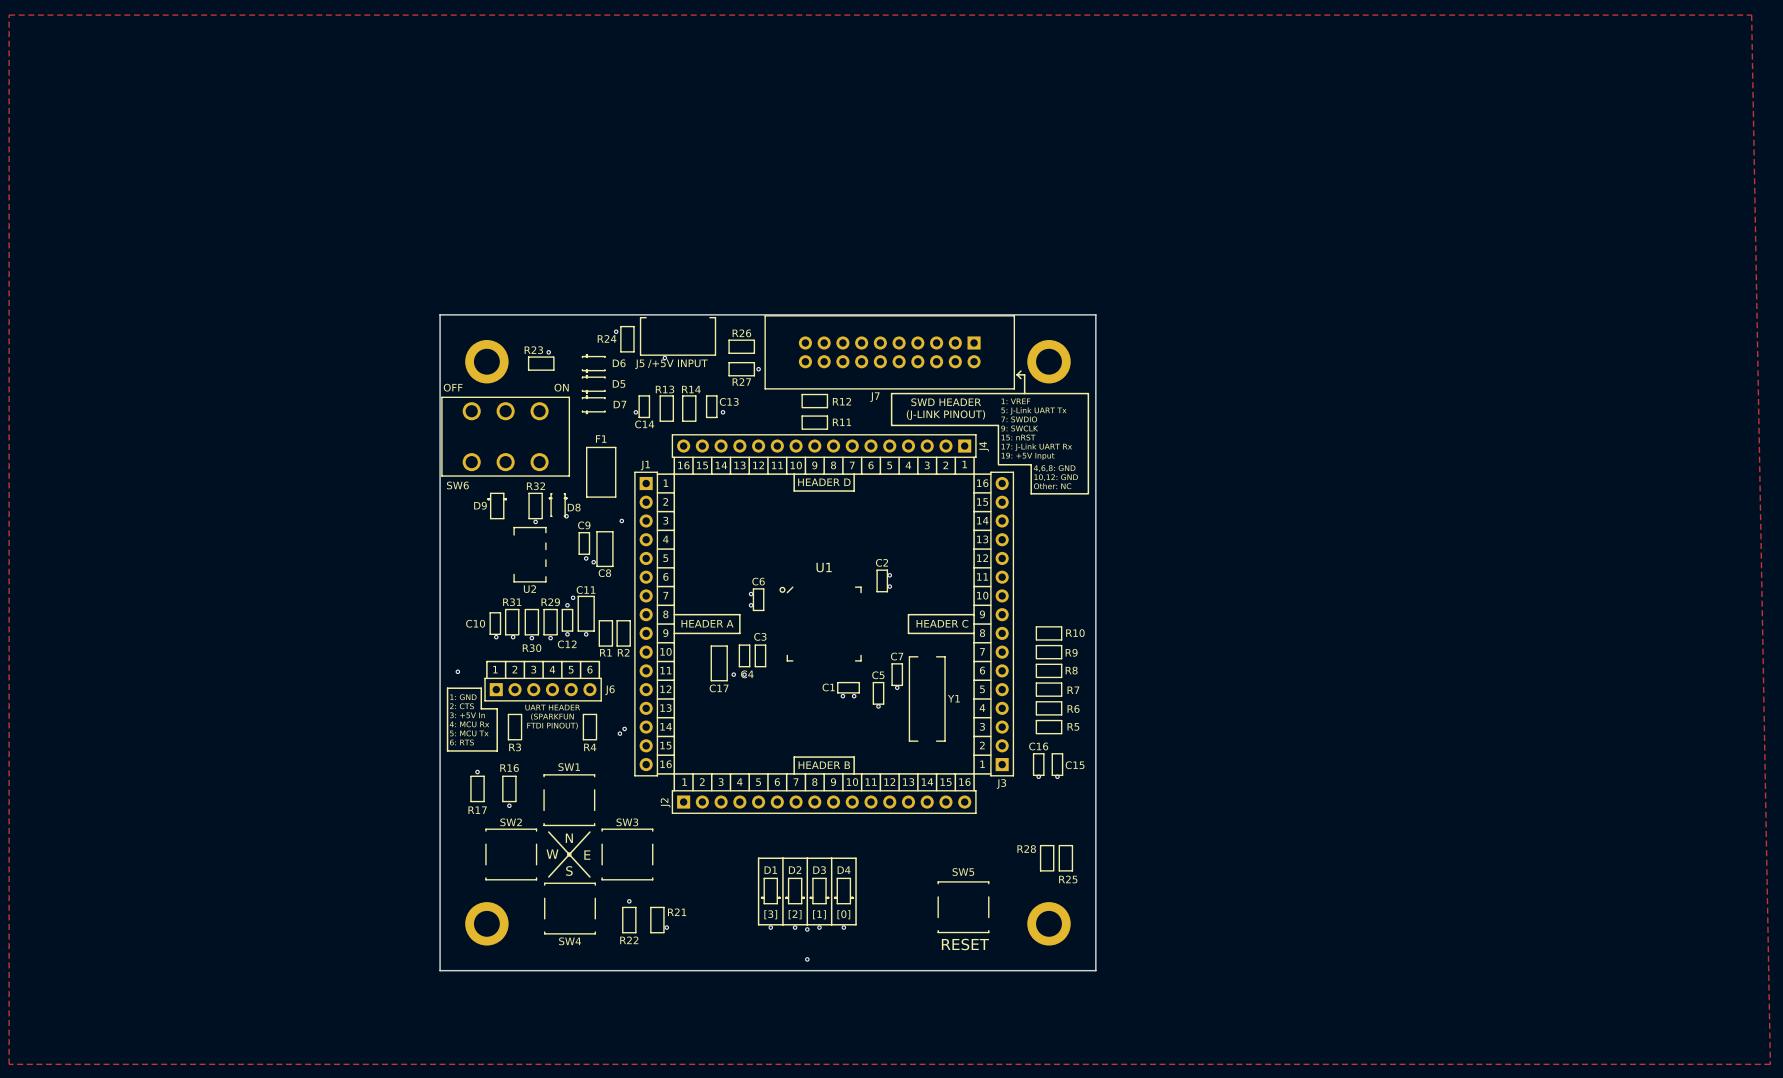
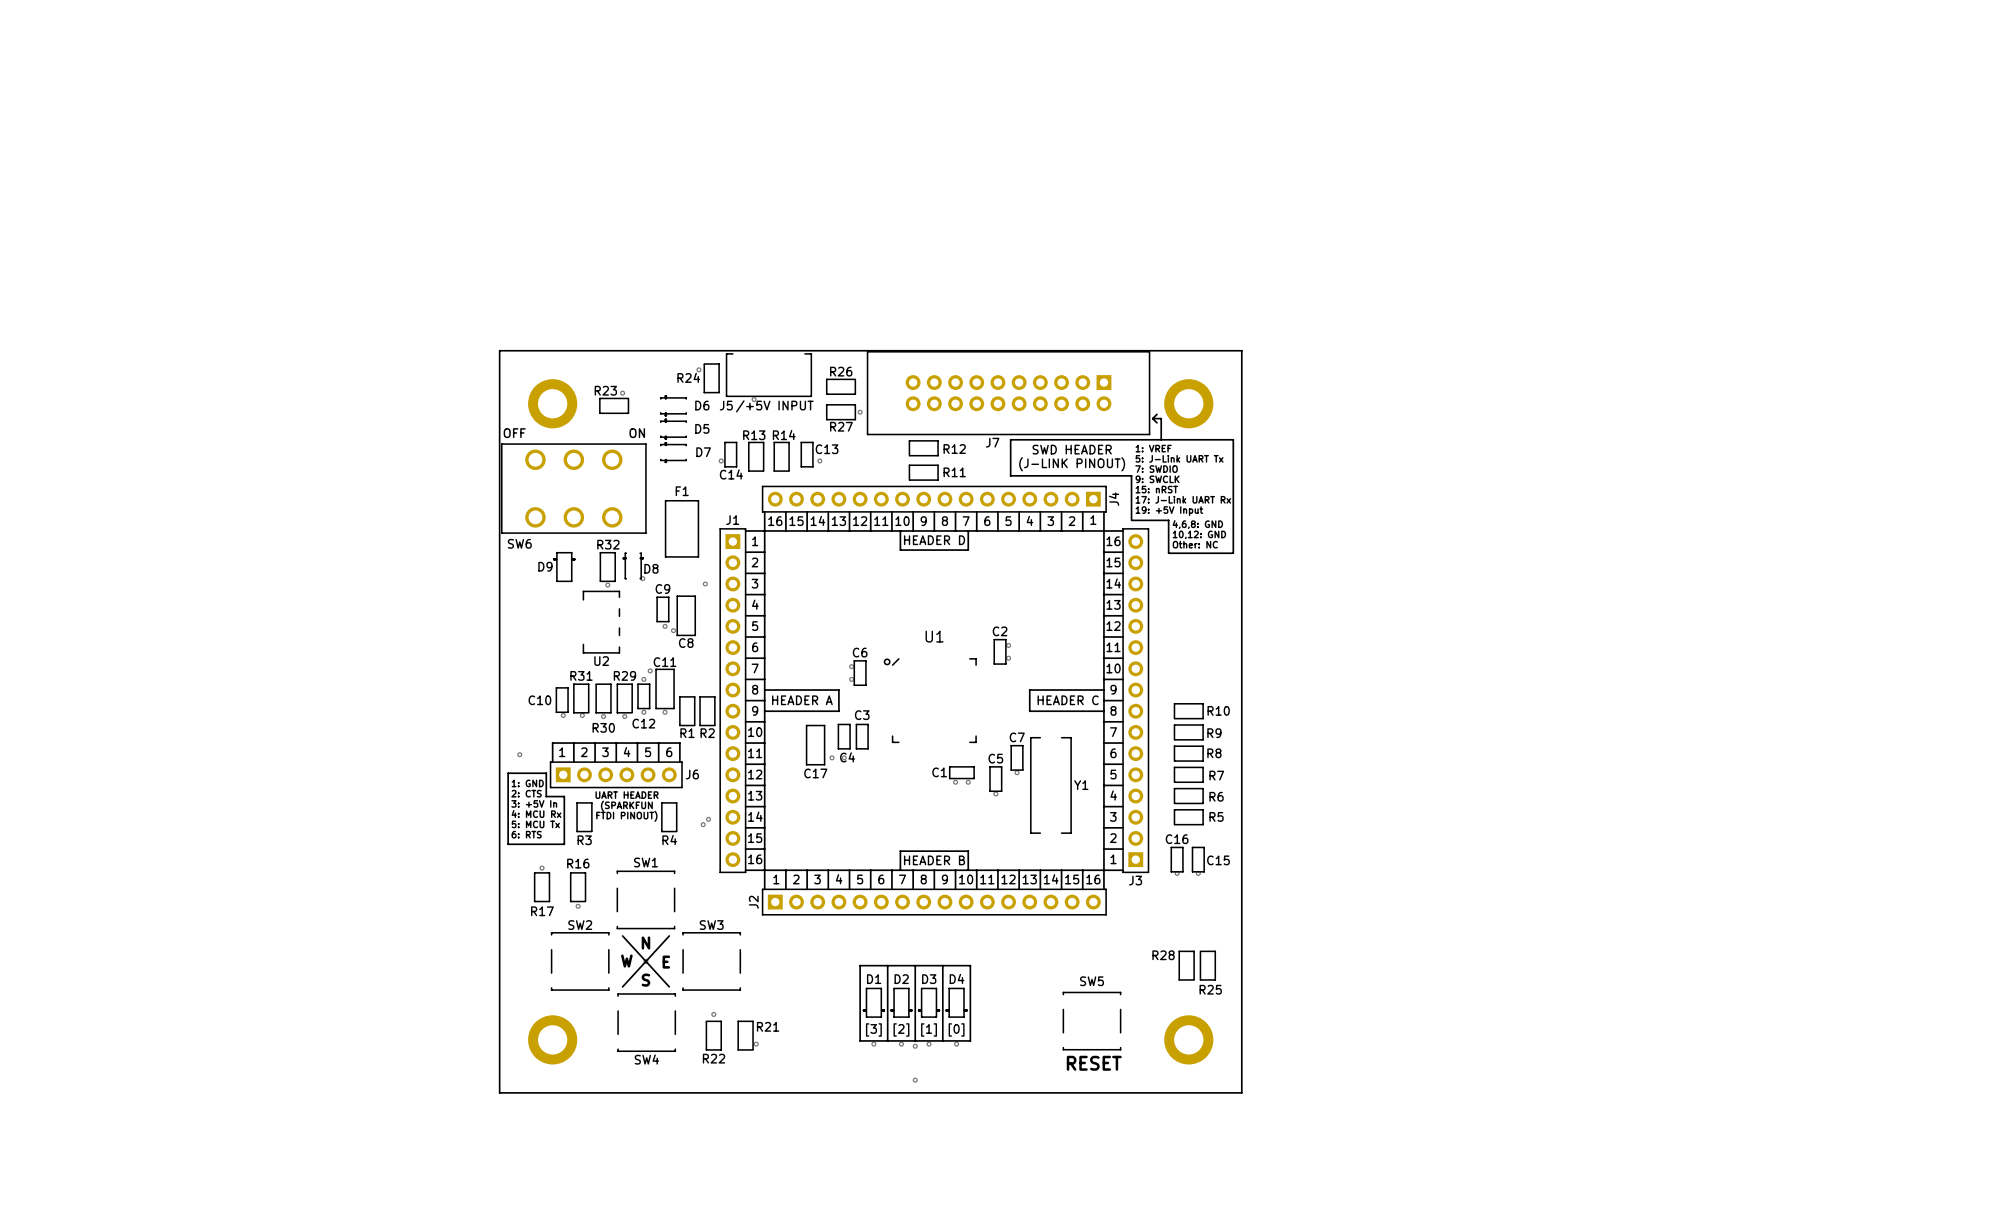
zone outline: (9, 15) (1751, 15) (1770, 1064) (9, 1064) (9, 15) -> none

